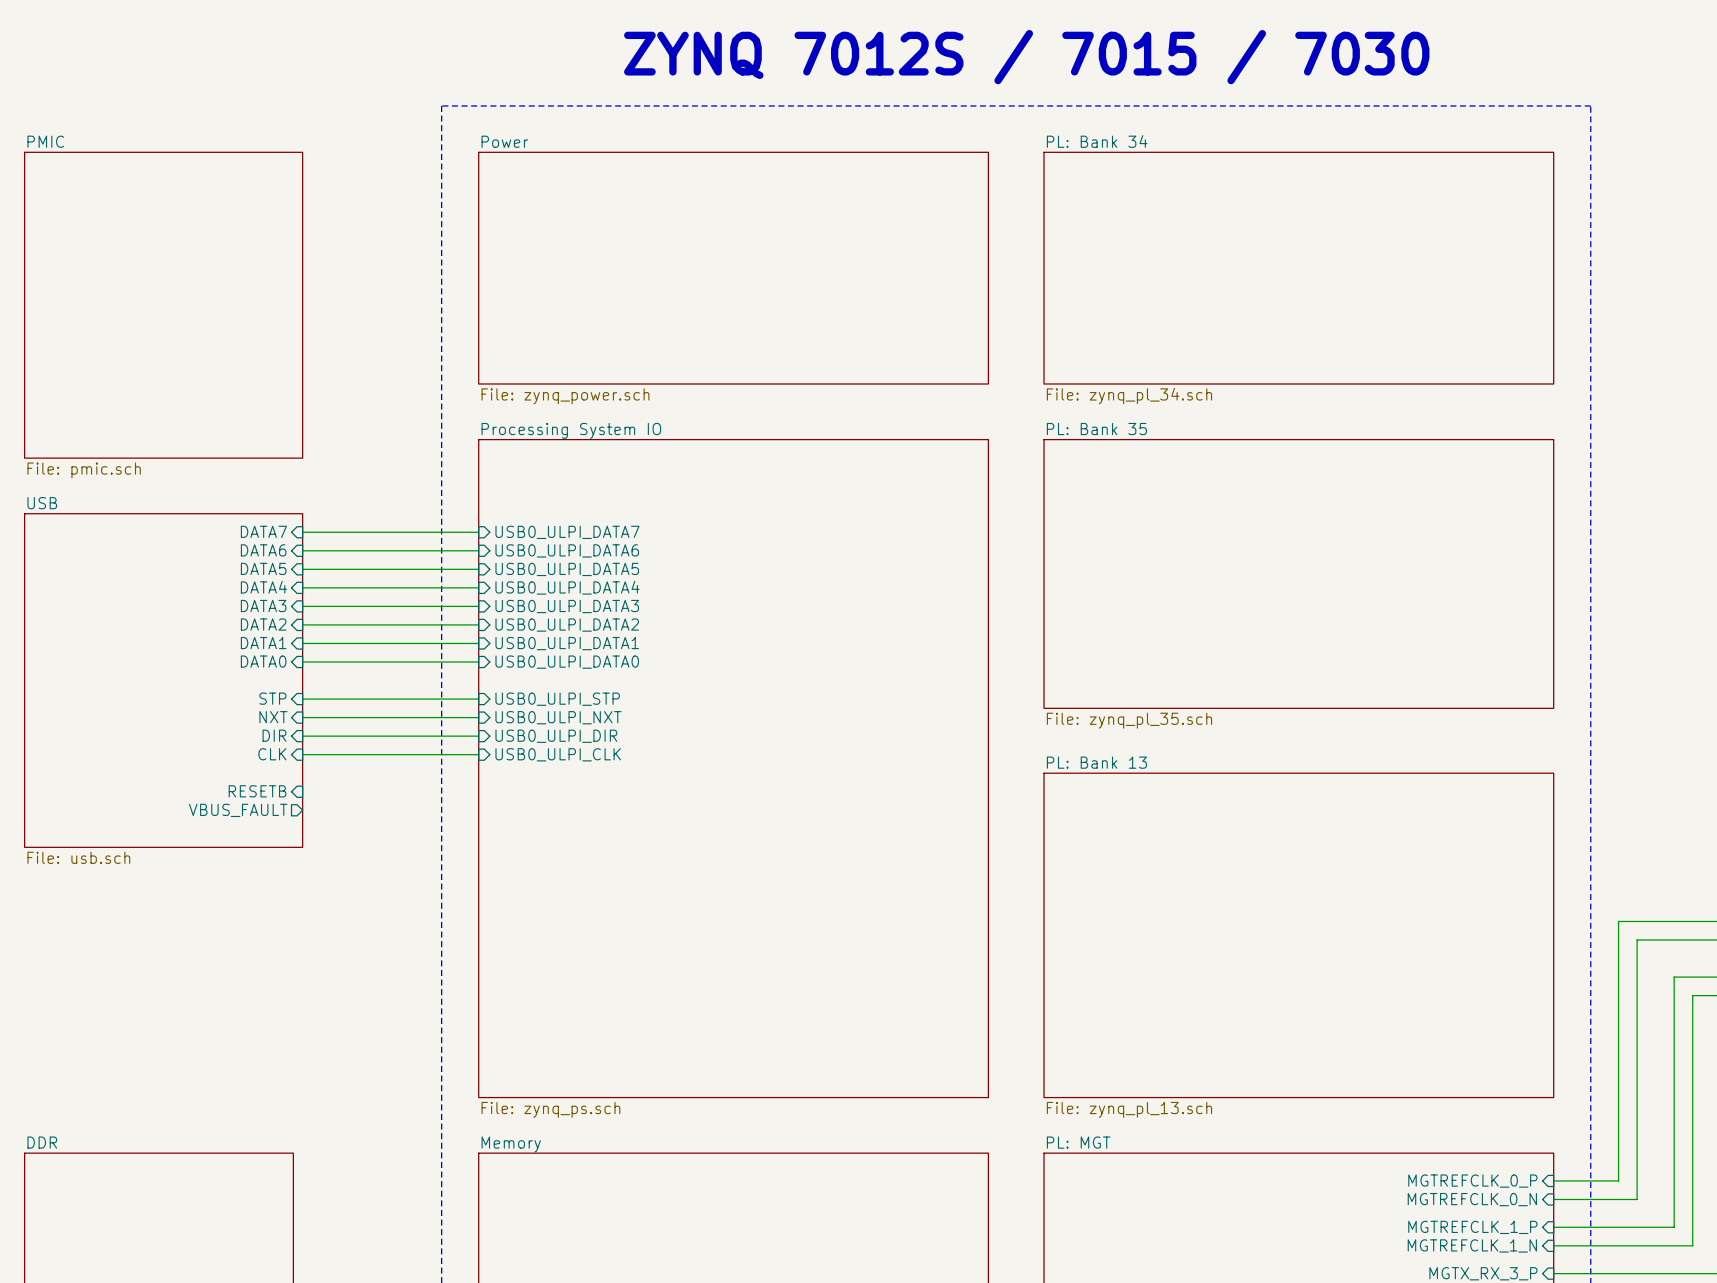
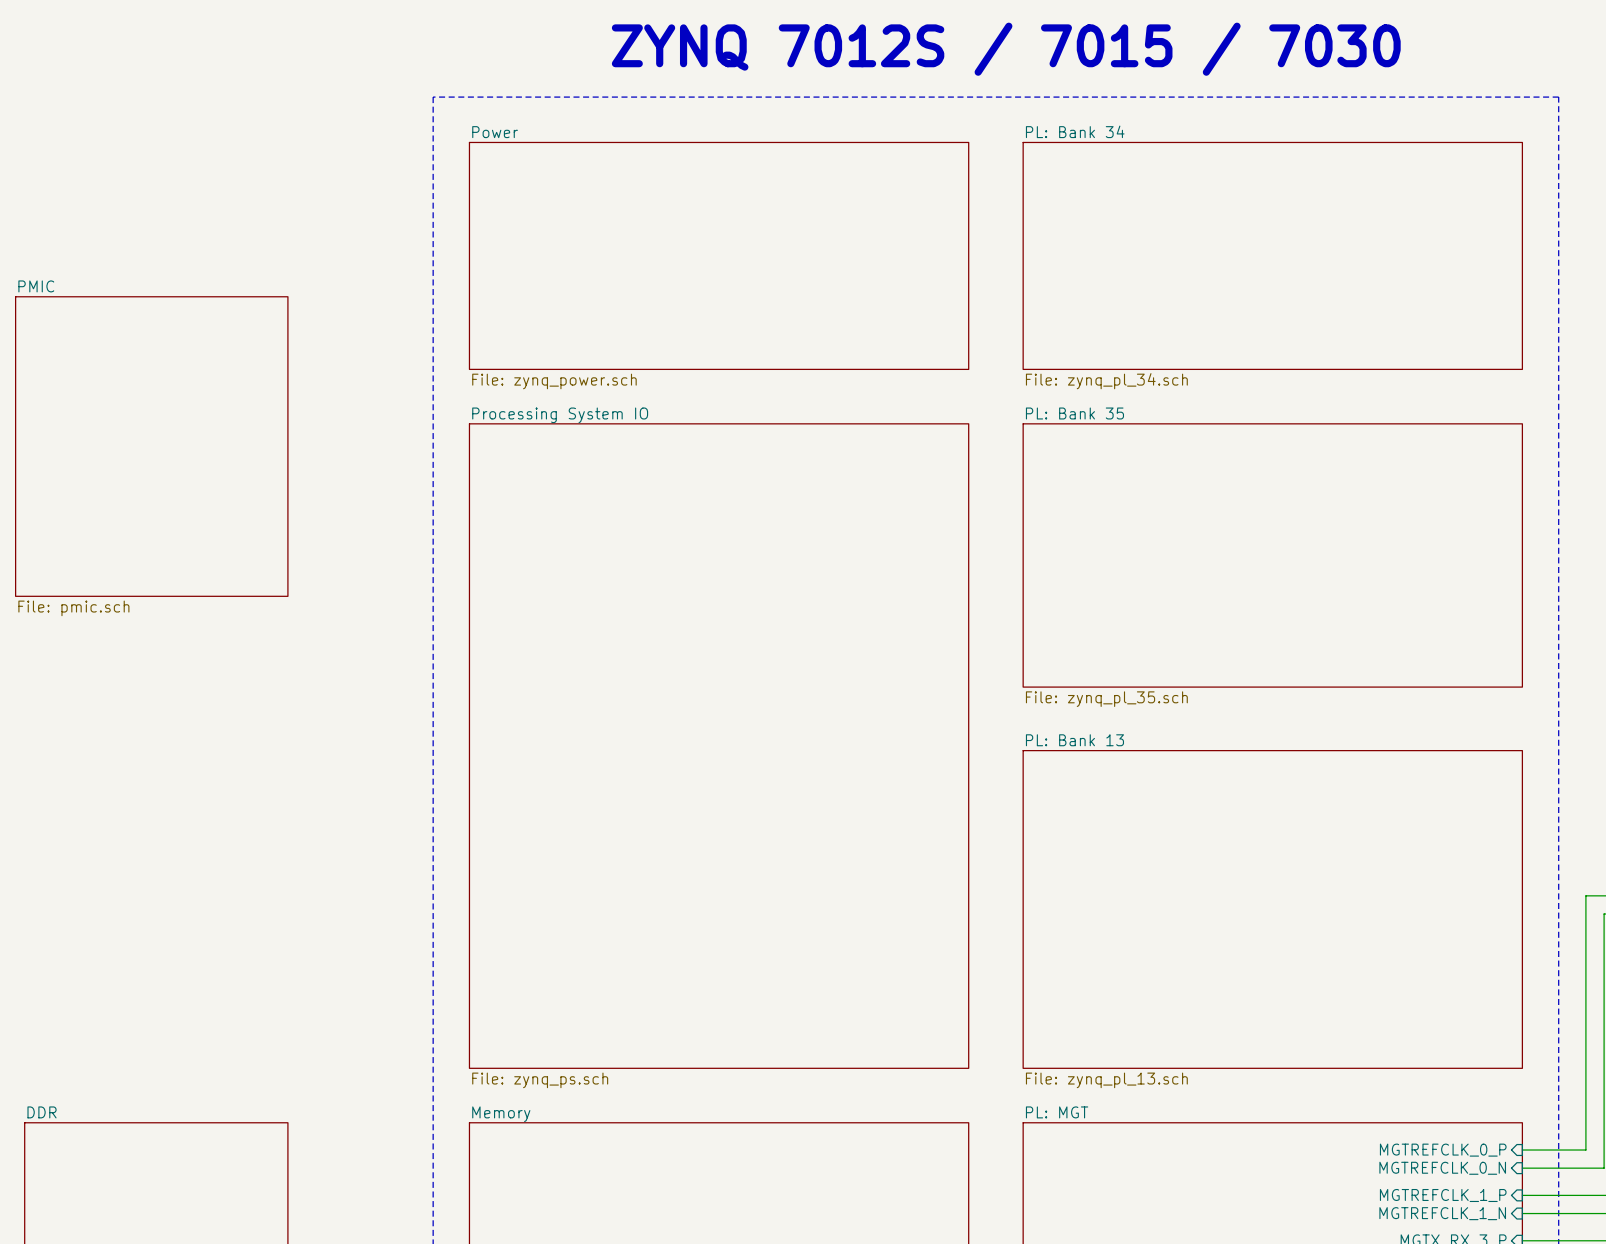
sheet PMIC position: (163, 305) -> (151, 446)
sheet pin: DATA7 (263, 531) -> none
wire: (302, 532) (478, 532) -> none
sheet pin: USB0_ULPI_DATA7 (567, 532) -> none
sheet pin: DATA6 (263, 550) -> none
wire: (302, 550) (478, 550) -> none
sheet pin: USB0_ULPI_DATA6 (567, 550) -> none
sheet pin: DATA5 (263, 568) -> none
wire: (302, 569) (478, 569) -> none
sheet pin: USB0_ULPI_DATA5 (567, 569) -> none
sheet pin: DATA4 (263, 587) -> none
wire: (302, 587) (478, 587) -> none
sheet pin: USB0_ULPI_DATA4 (567, 587) -> none
sheet pin: DATA3 (263, 605) -> none
wire: (302, 606) (478, 606) -> none
sheet pin: USB0_ULPI_DATA3 (567, 606) -> none
sheet pin: DATA2 (263, 624) -> none
wire: (302, 624) (478, 624) -> none
sheet pin: USB0_ULPI_DATA2 (567, 625) -> none
sheet pin: DATA1 (263, 643) -> none
wire: (302, 643) (478, 643) -> none
sheet pin: USB0_ULPI_DATA1 (567, 643) -> none
sheet pin: DATA0 (263, 661) -> none
wire: (302, 662) (478, 662) -> none
sheet pin: USB0_ULPI_DATA0 (567, 662) -> none
sheet USB: File: usb.sch (163, 680) -> none
sheet pin: STP (272, 698) -> none
wire: (302, 699) (478, 699) -> none
sheet pin: USB0_ULPI_STP (557, 699) -> none
sheet pin: NXT (273, 717) -> none
wire: (302, 717) (478, 717) -> none
sheet pin: USB0_ULPI_NXT (558, 717) -> none
sheet pin: DIR (274, 735) -> none
wire: (302, 736) (478, 736) -> none
sheet pin: USB0_ULPI_DIR (556, 736) -> none
sheet pin: CLK (272, 754) -> none
wire: (302, 754) (478, 754) -> none
sheet pin: USB0_ULPI_CLK (558, 754) -> none
sheet pin: RESETB (257, 791) -> none
sheet pin: VBUS_FAULT (238, 810) -> none

